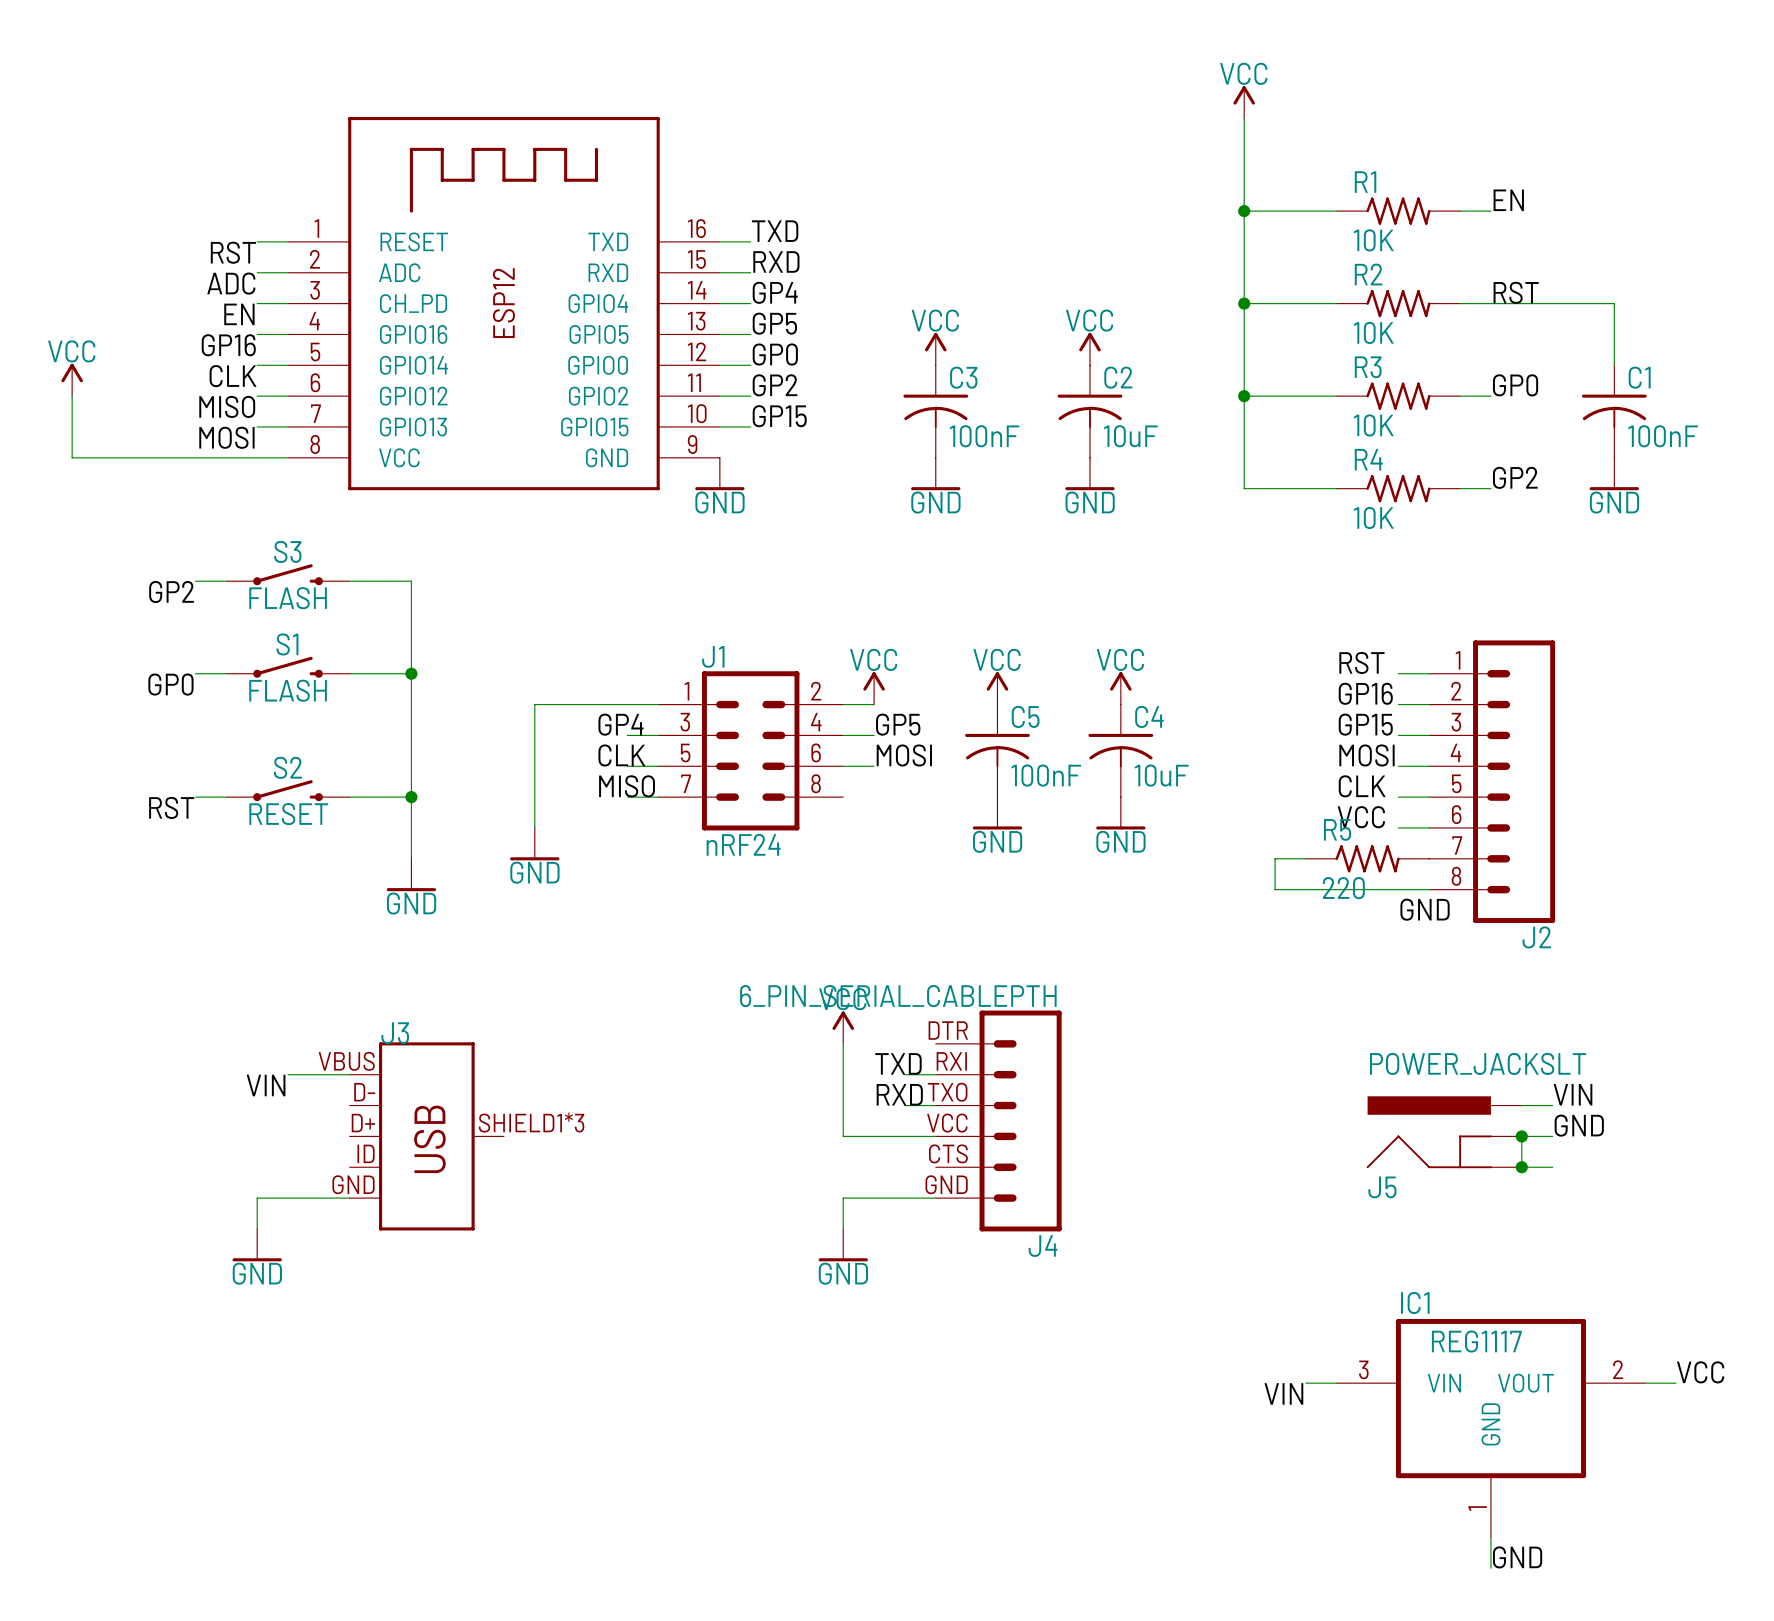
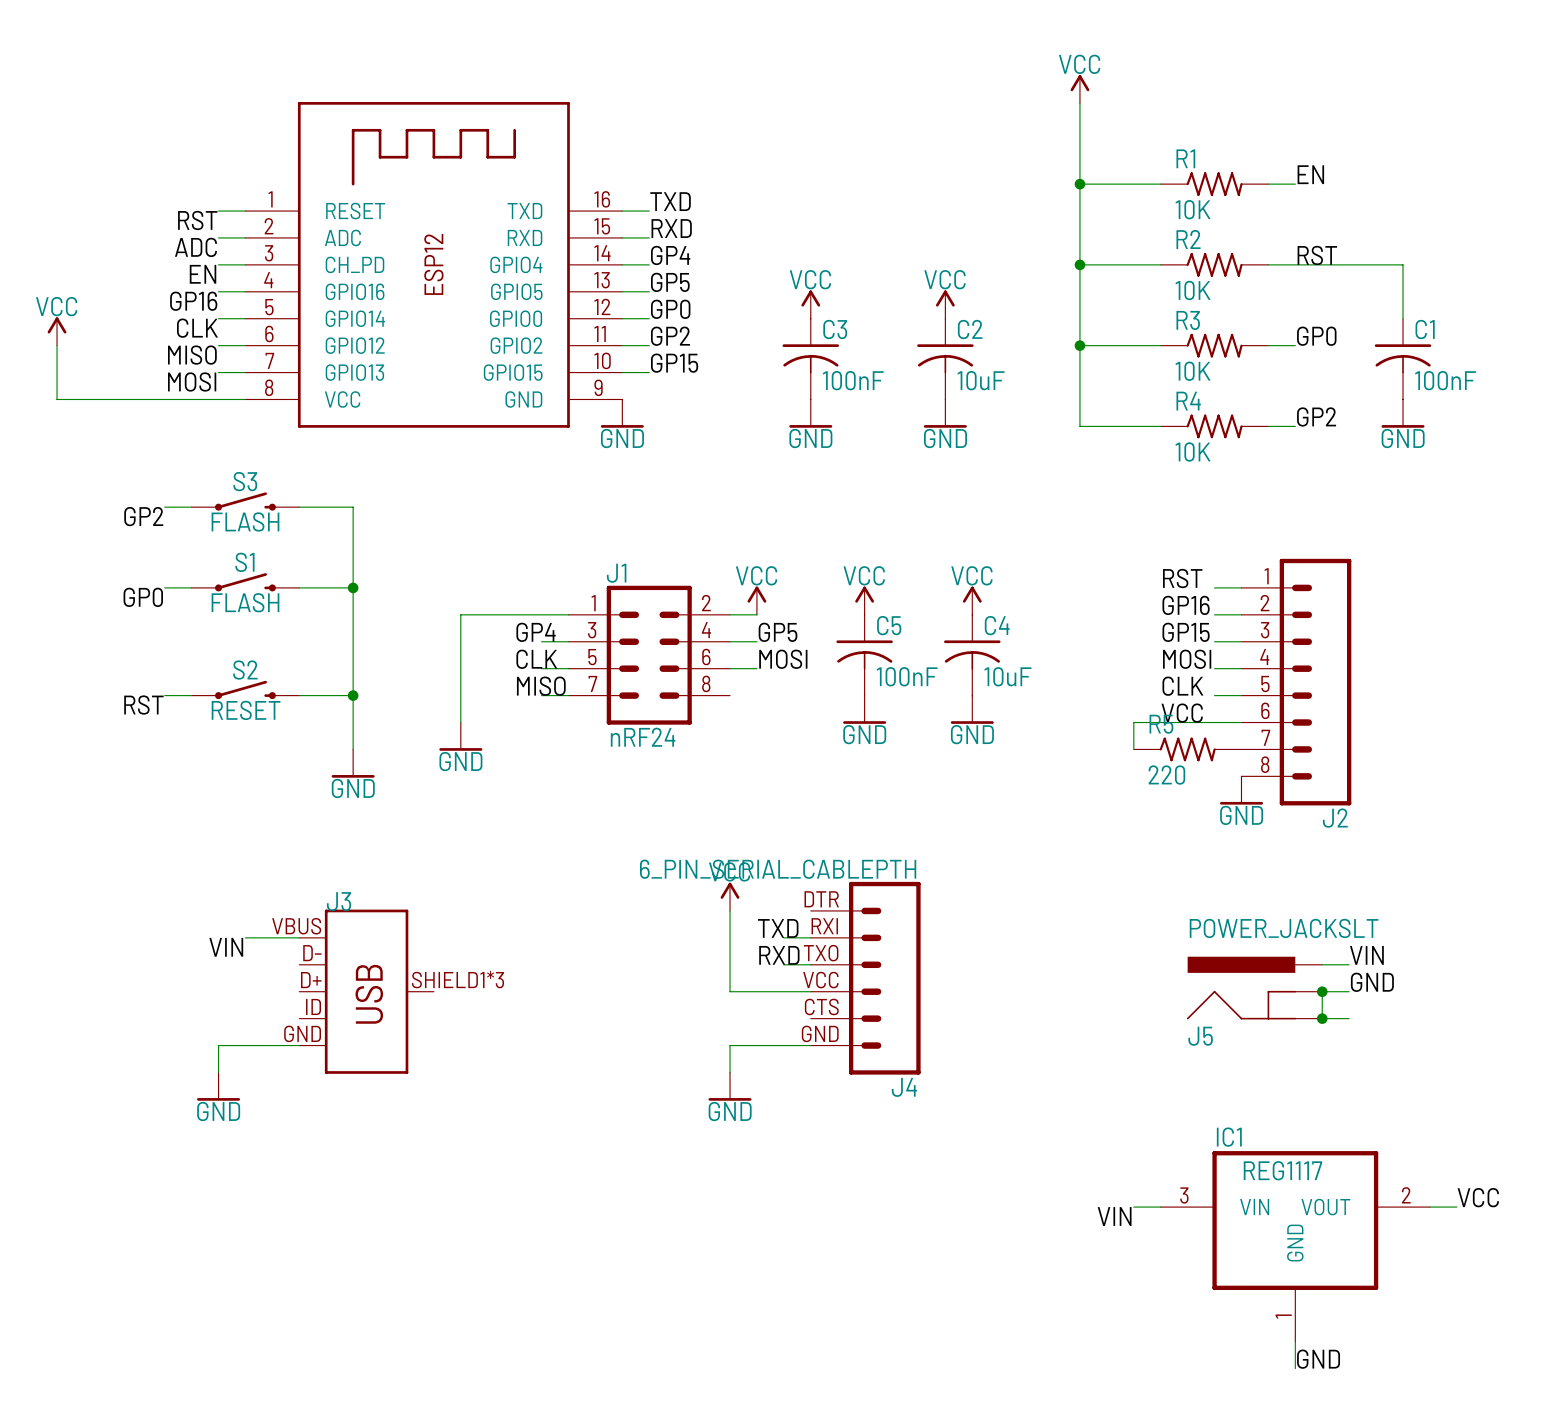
wire: (1305, 858) (1275, 858) (1275, 889) (1429, 889) -> (1133, 749) (1133, 722) (1214, 722)
power symbol: none -> GND (1241, 790)
label: GND (1425, 909) -> none

